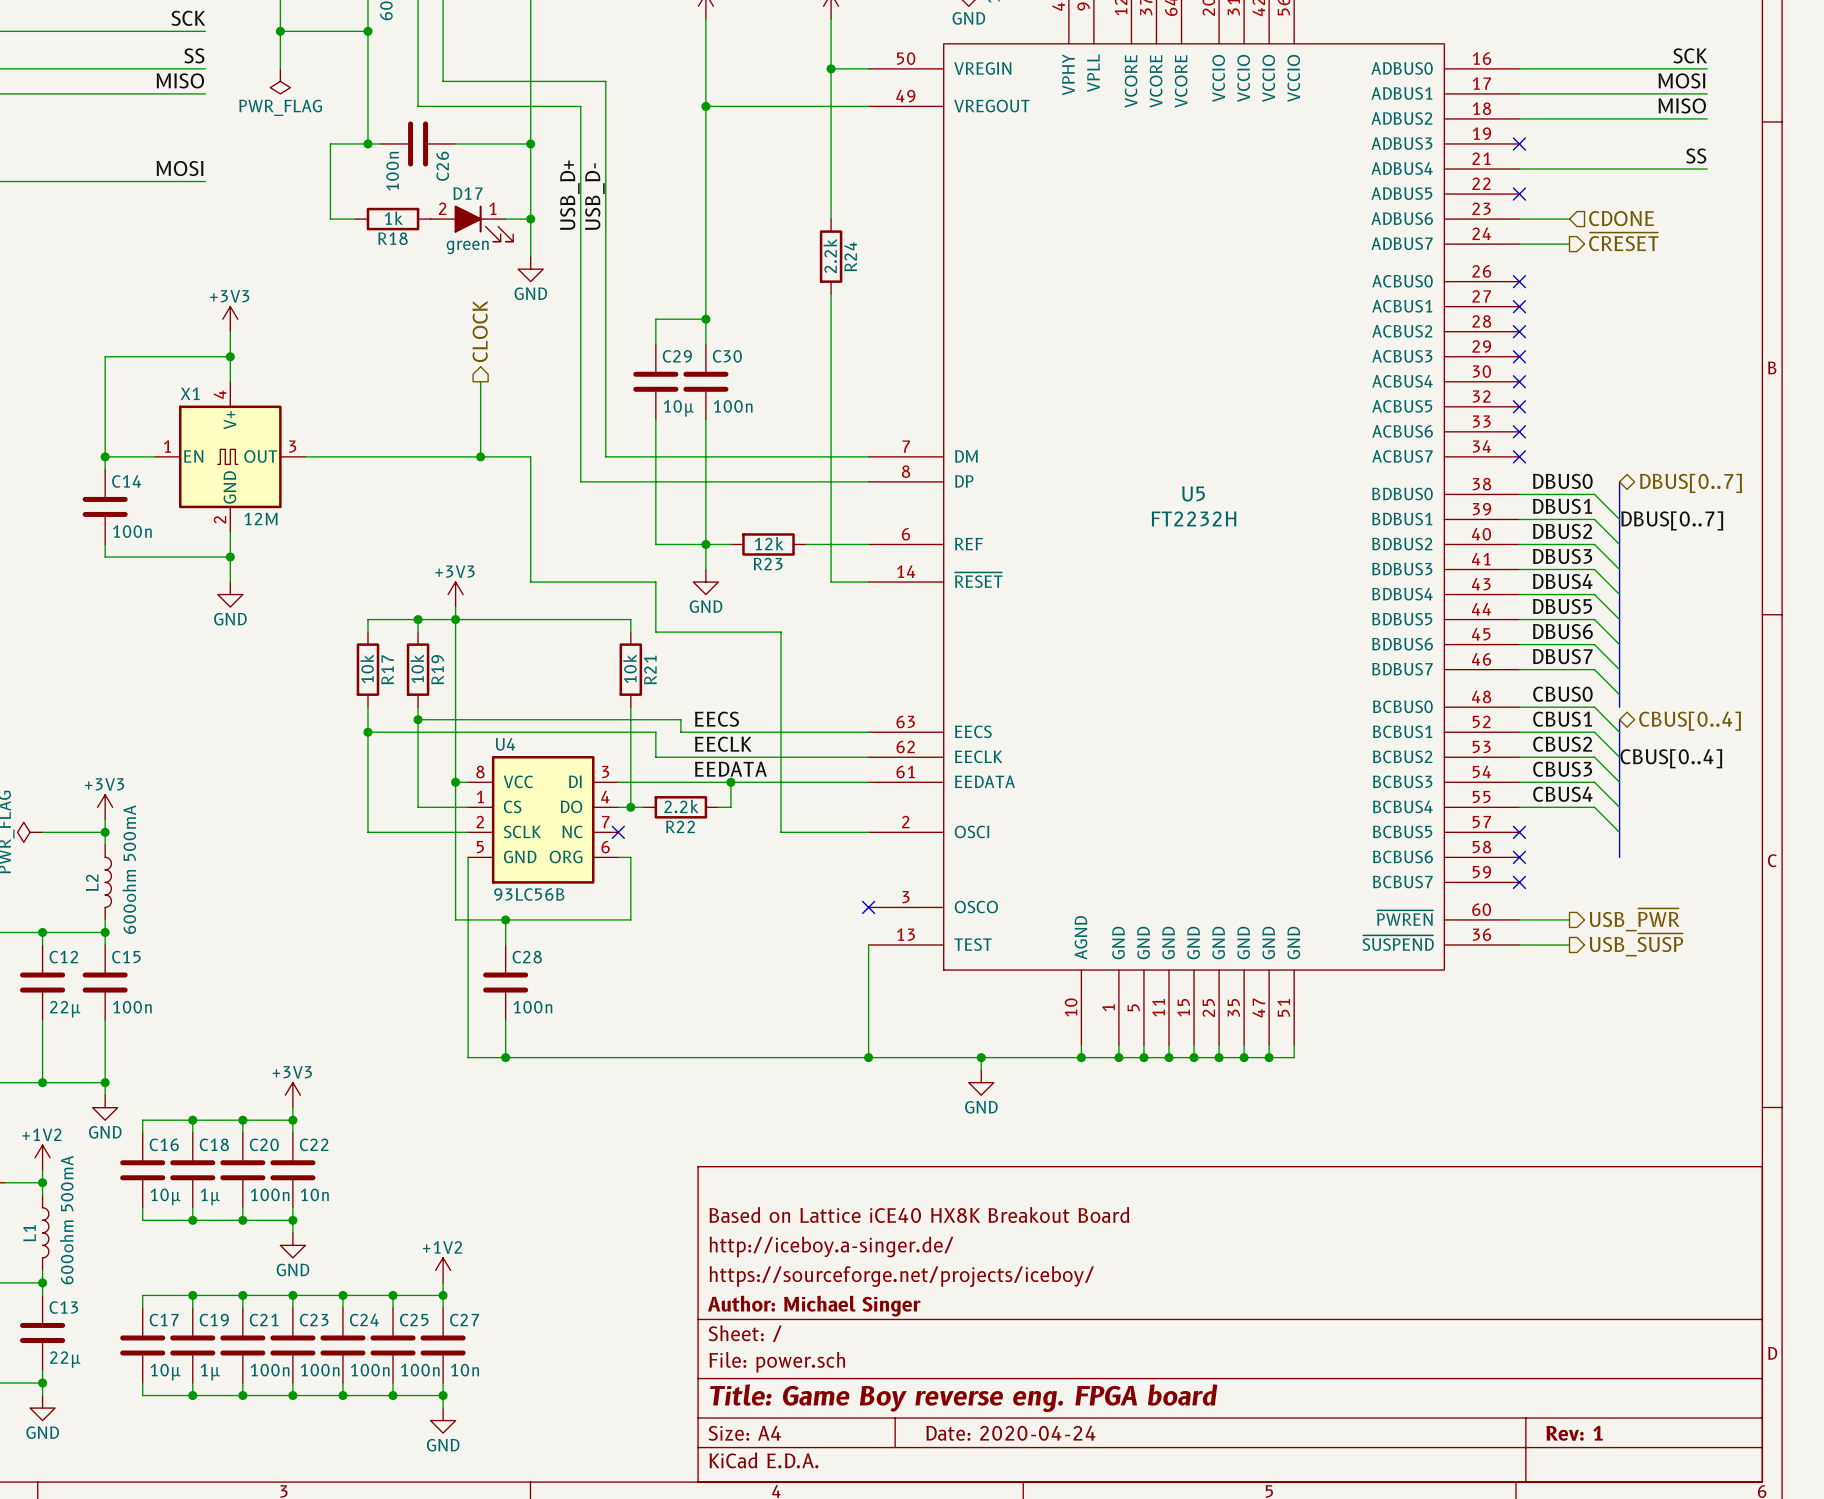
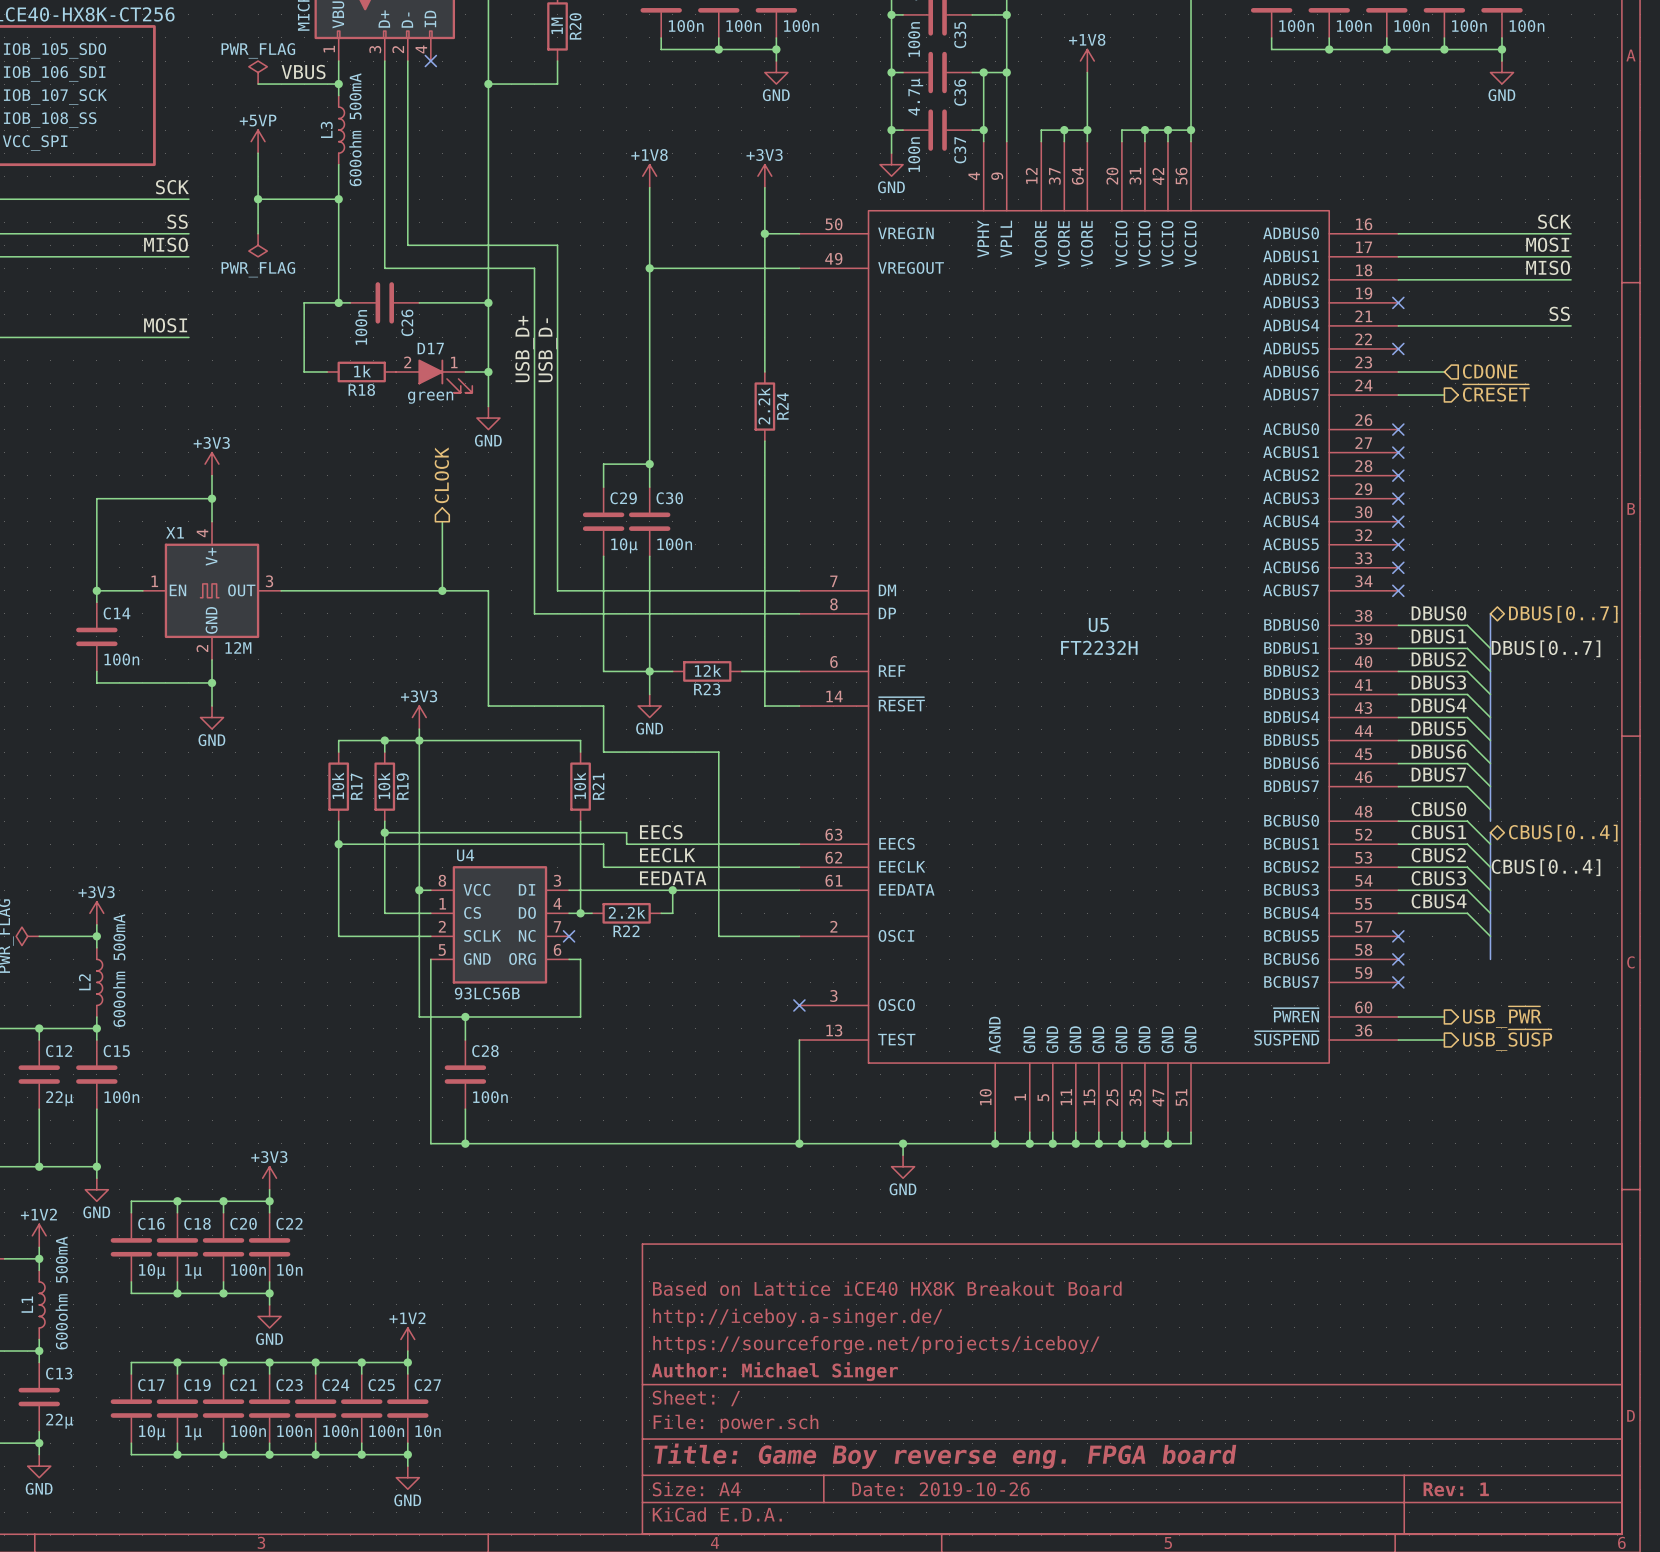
title block: Date: 2020-04-24 (1010, 1433) -> Date: 2019-10-26 (940, 1489)

